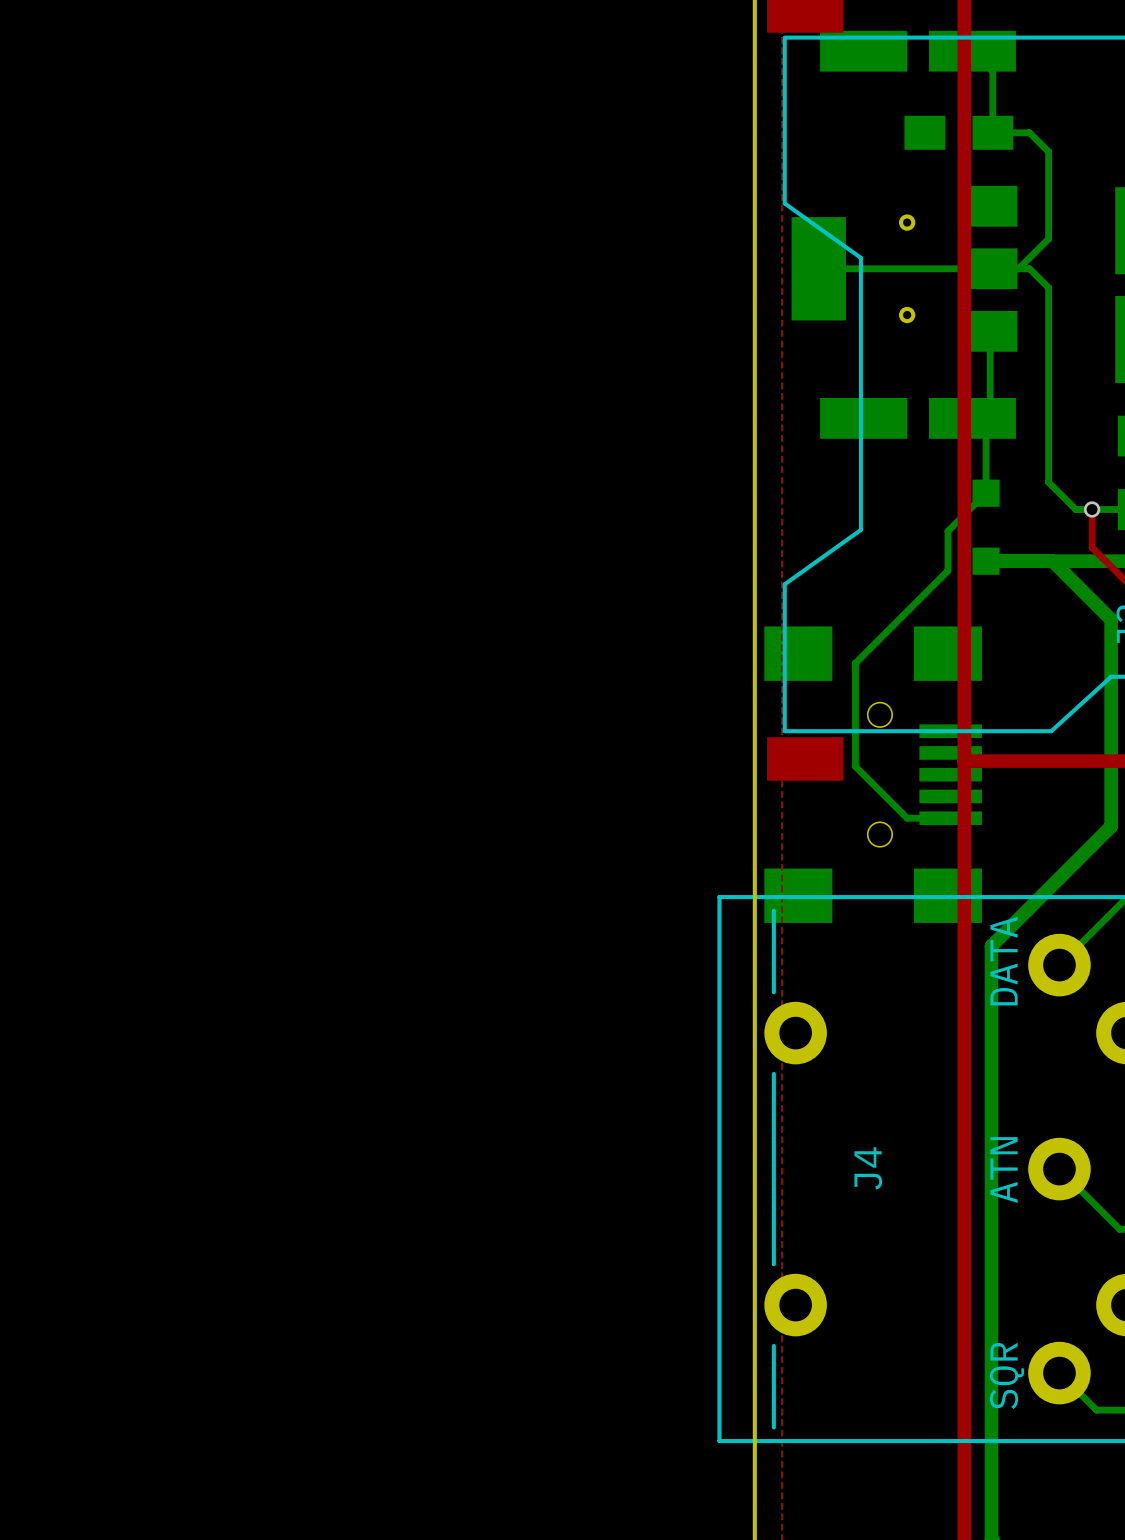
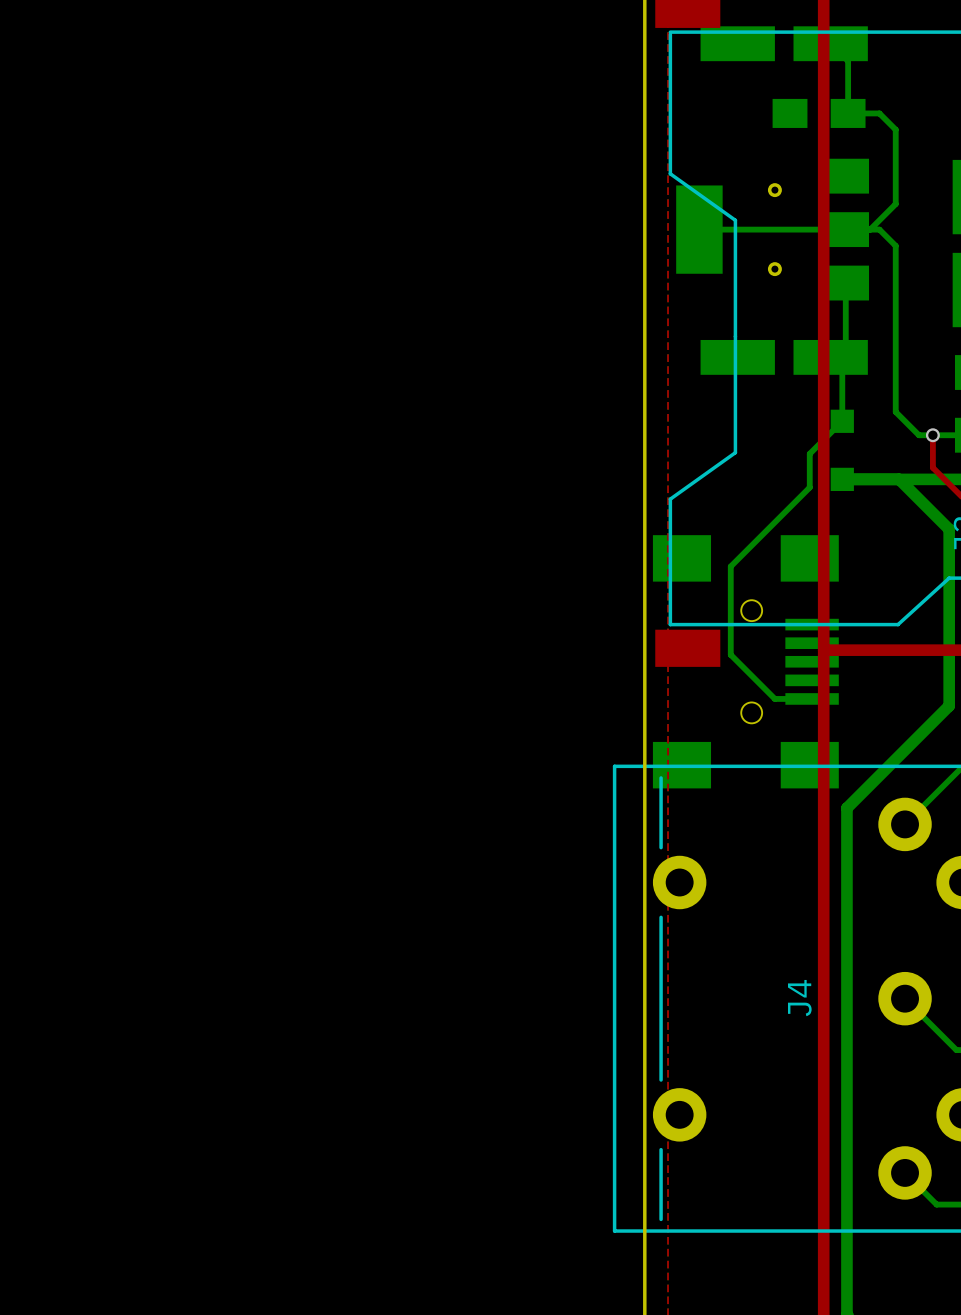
text: DATA (1004, 961) -> none
J4 name position: J4 (868, 1168) -> J4 (799, 998)
text: ATN (1004, 1170) -> none
text: SQR (1007, 1375) -> none

